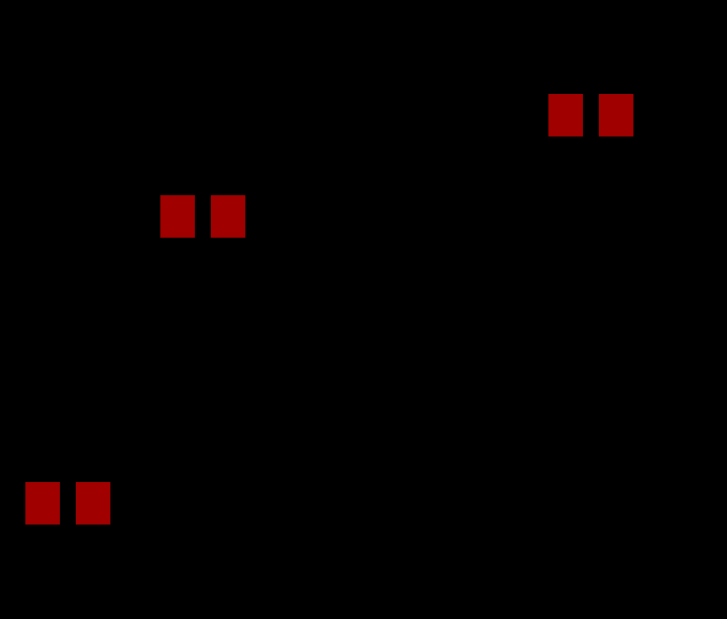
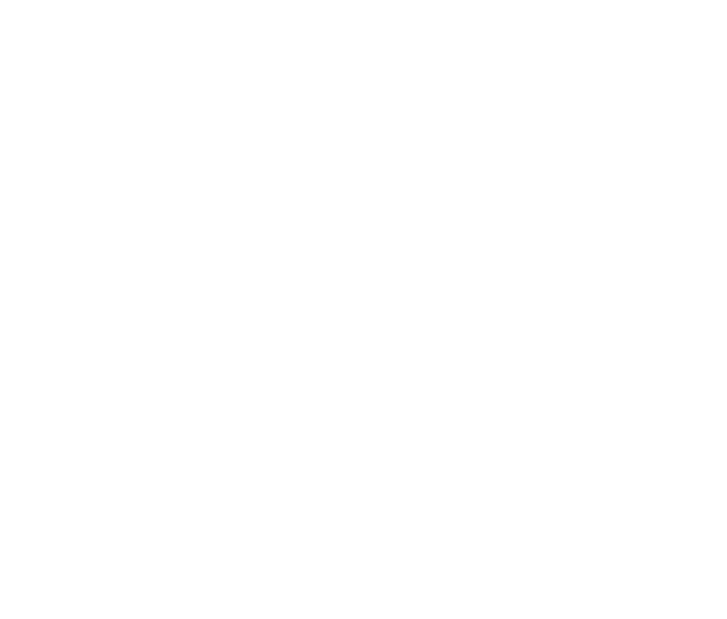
part: (590, 115) -> none
part: (202, 216) -> none
part: (67, 503) -> none

